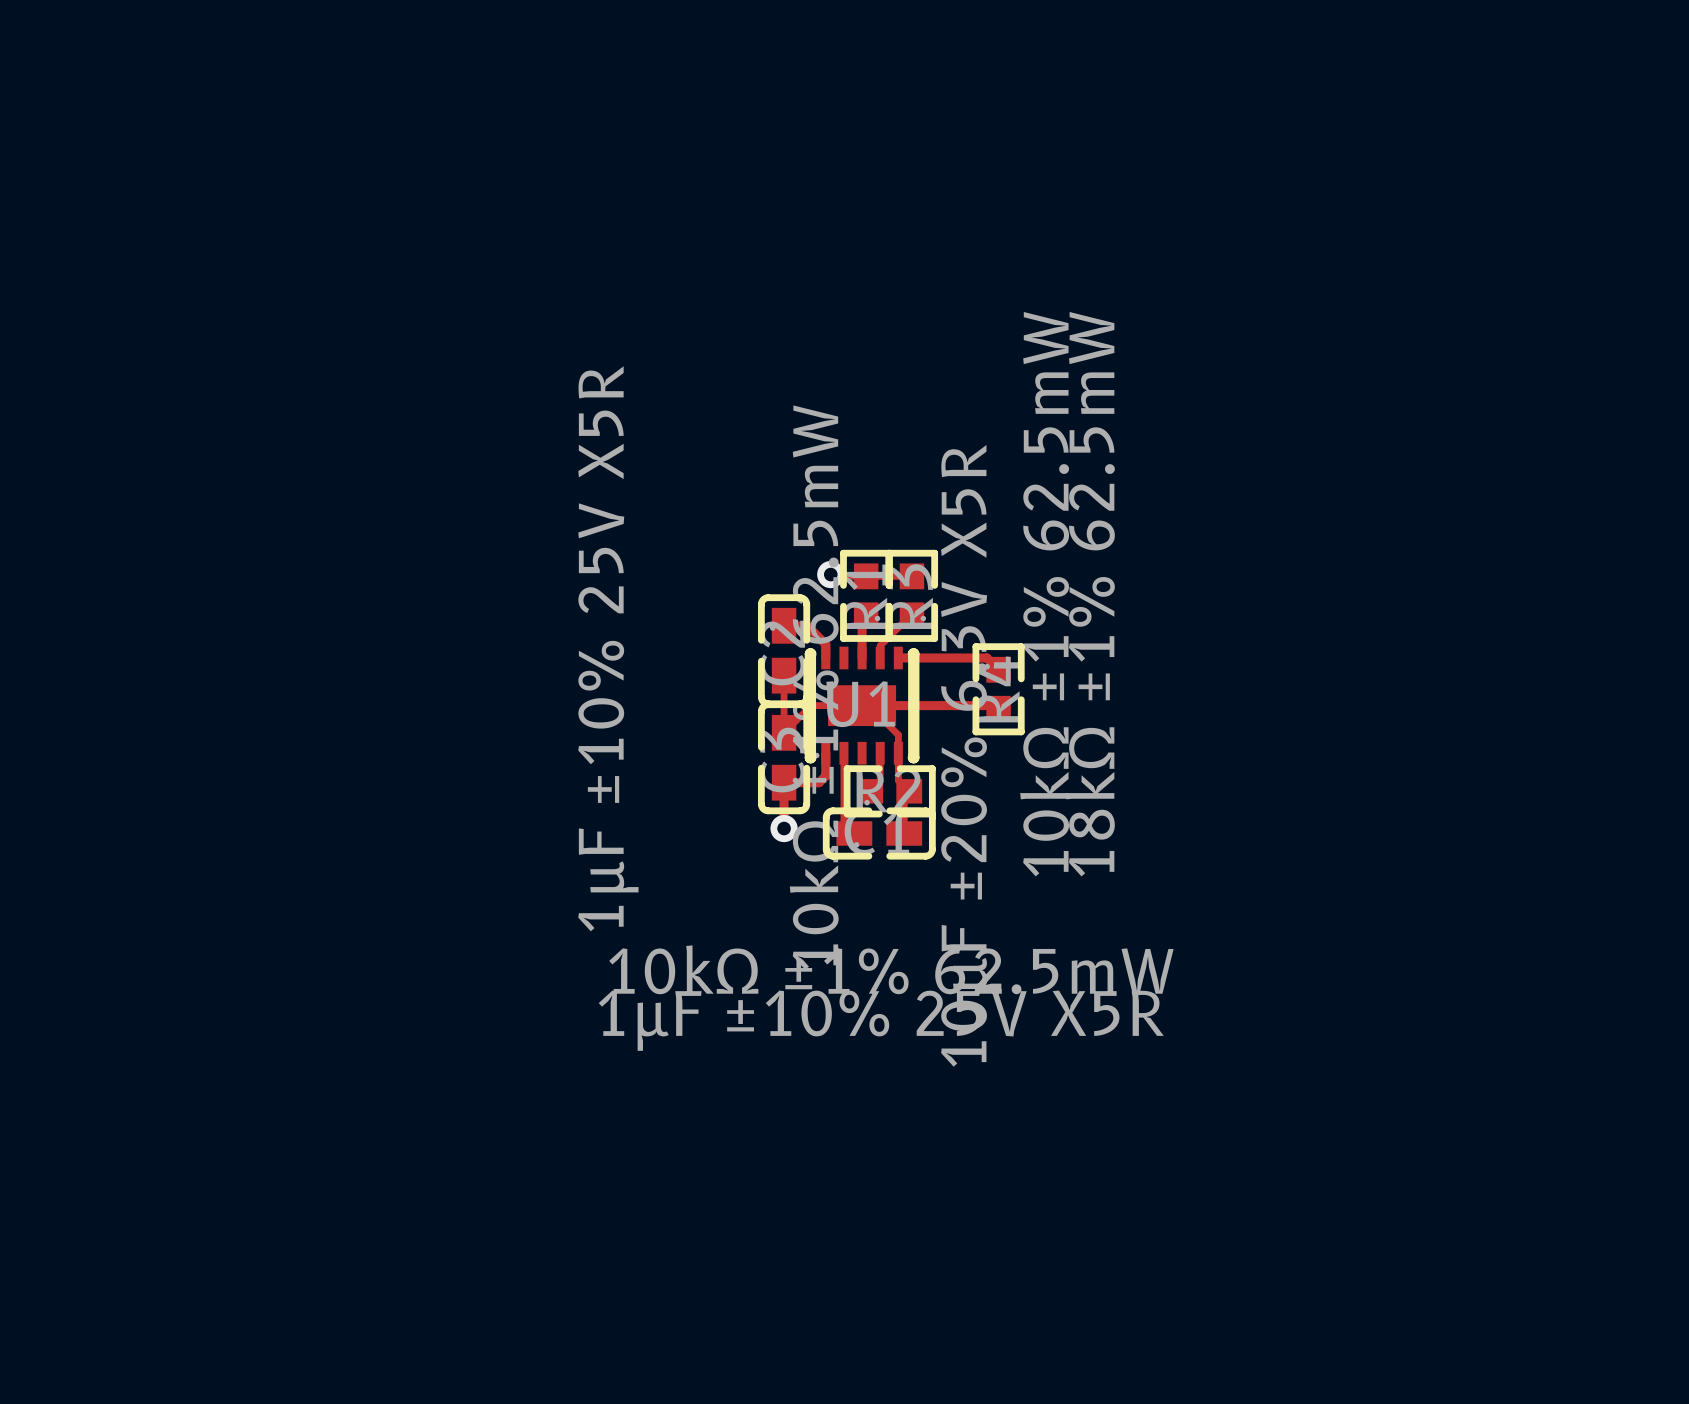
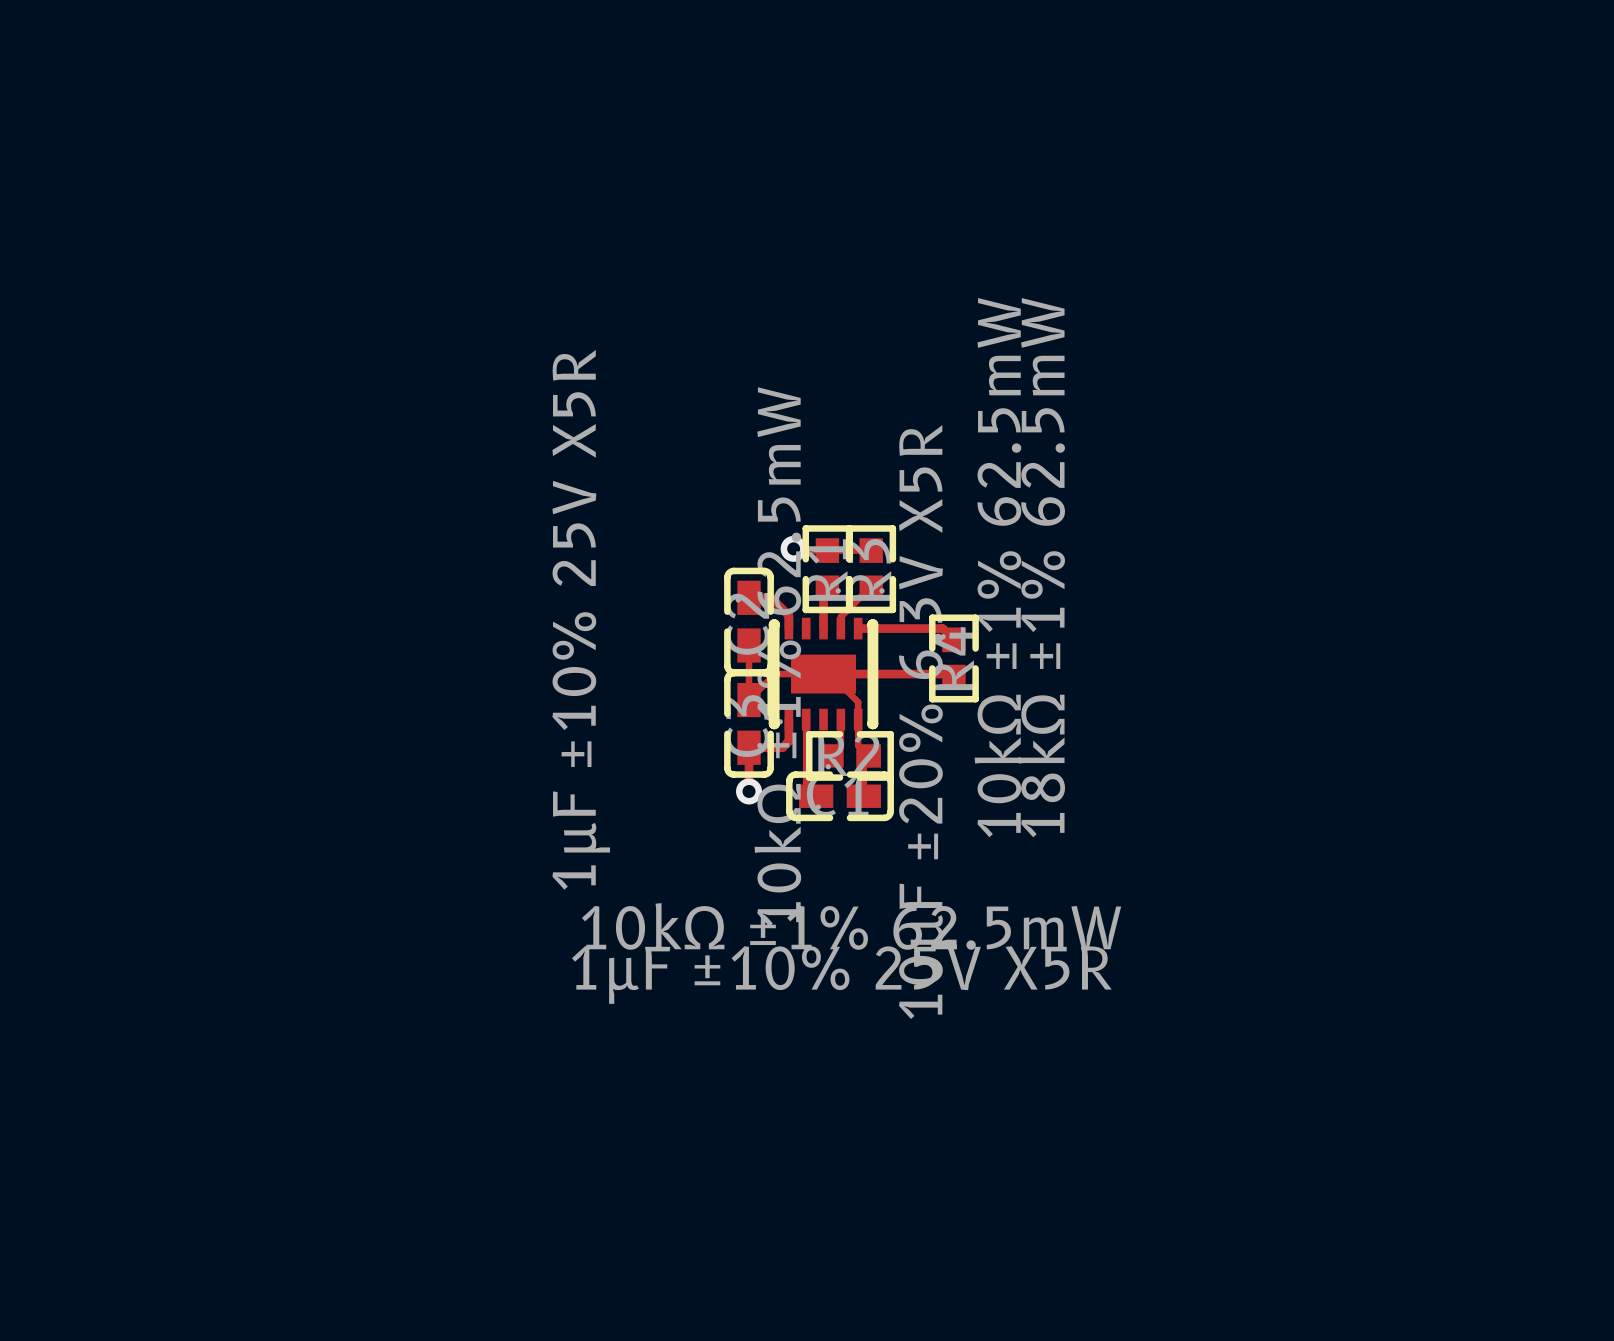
U1 name: U1 (860, 704) -> none

